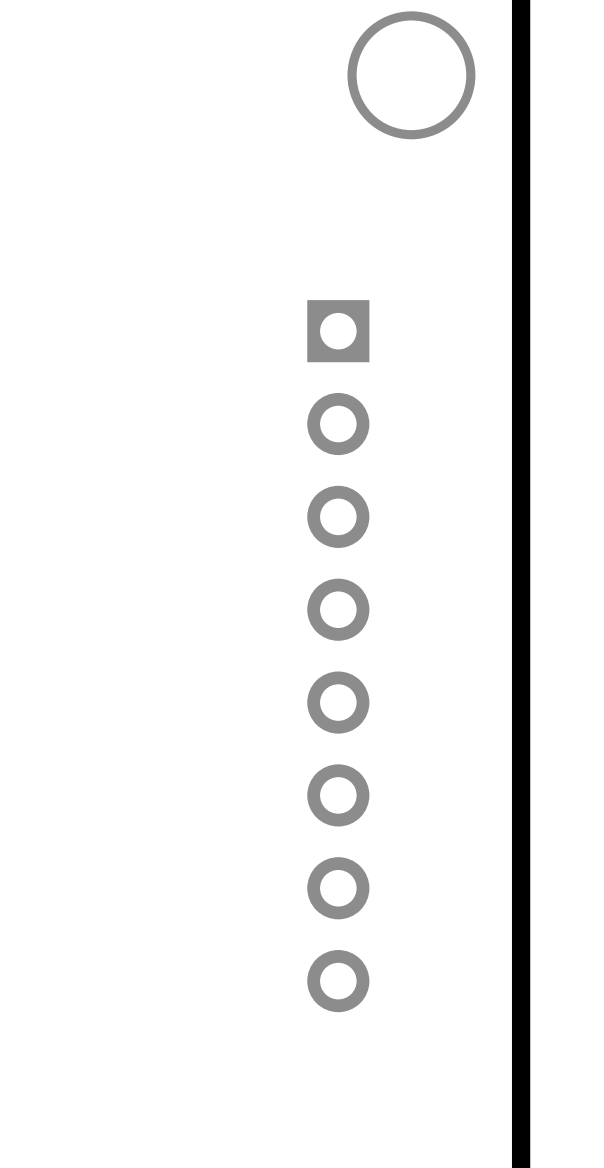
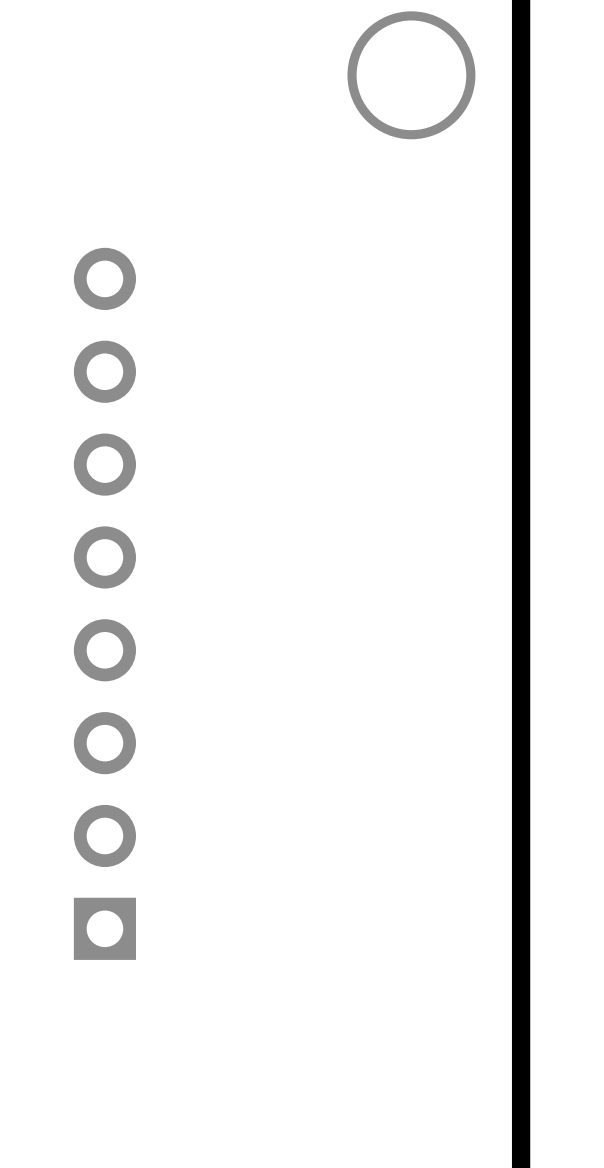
part rotation: 0° (338, 656) -> 180° (104, 603)

